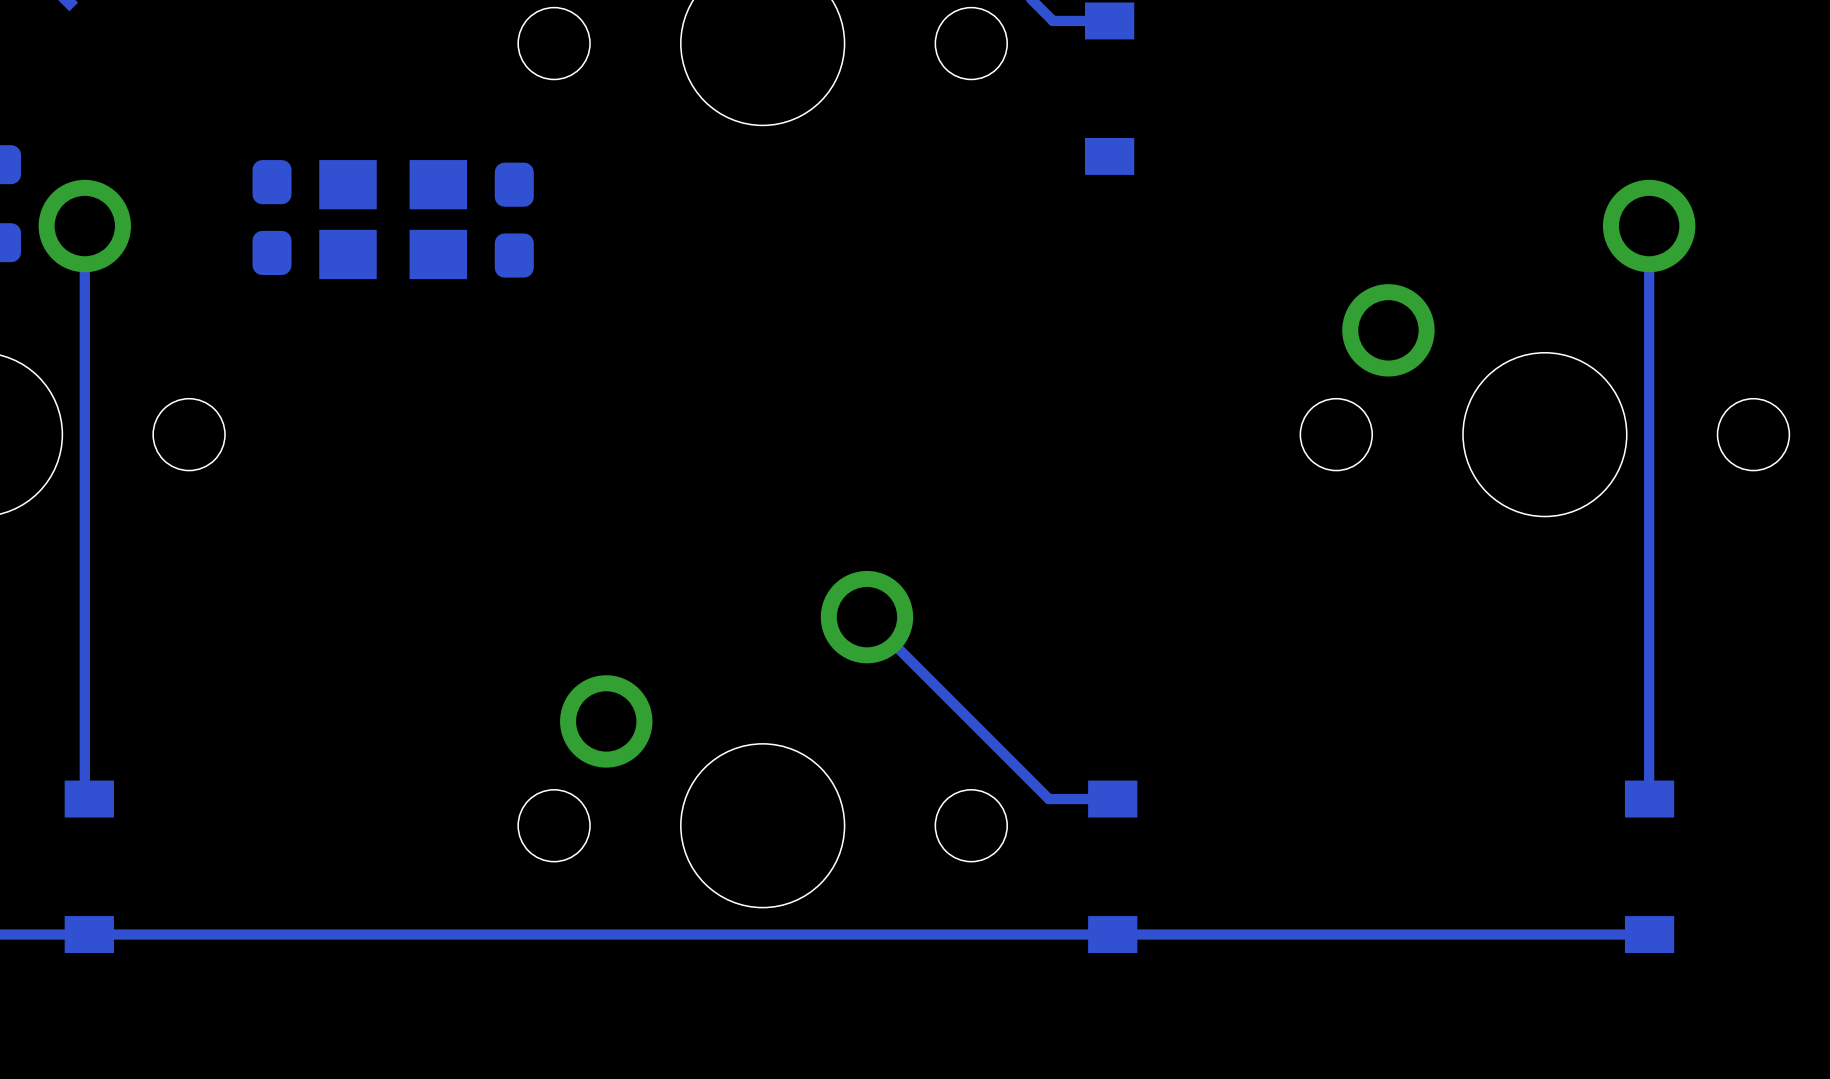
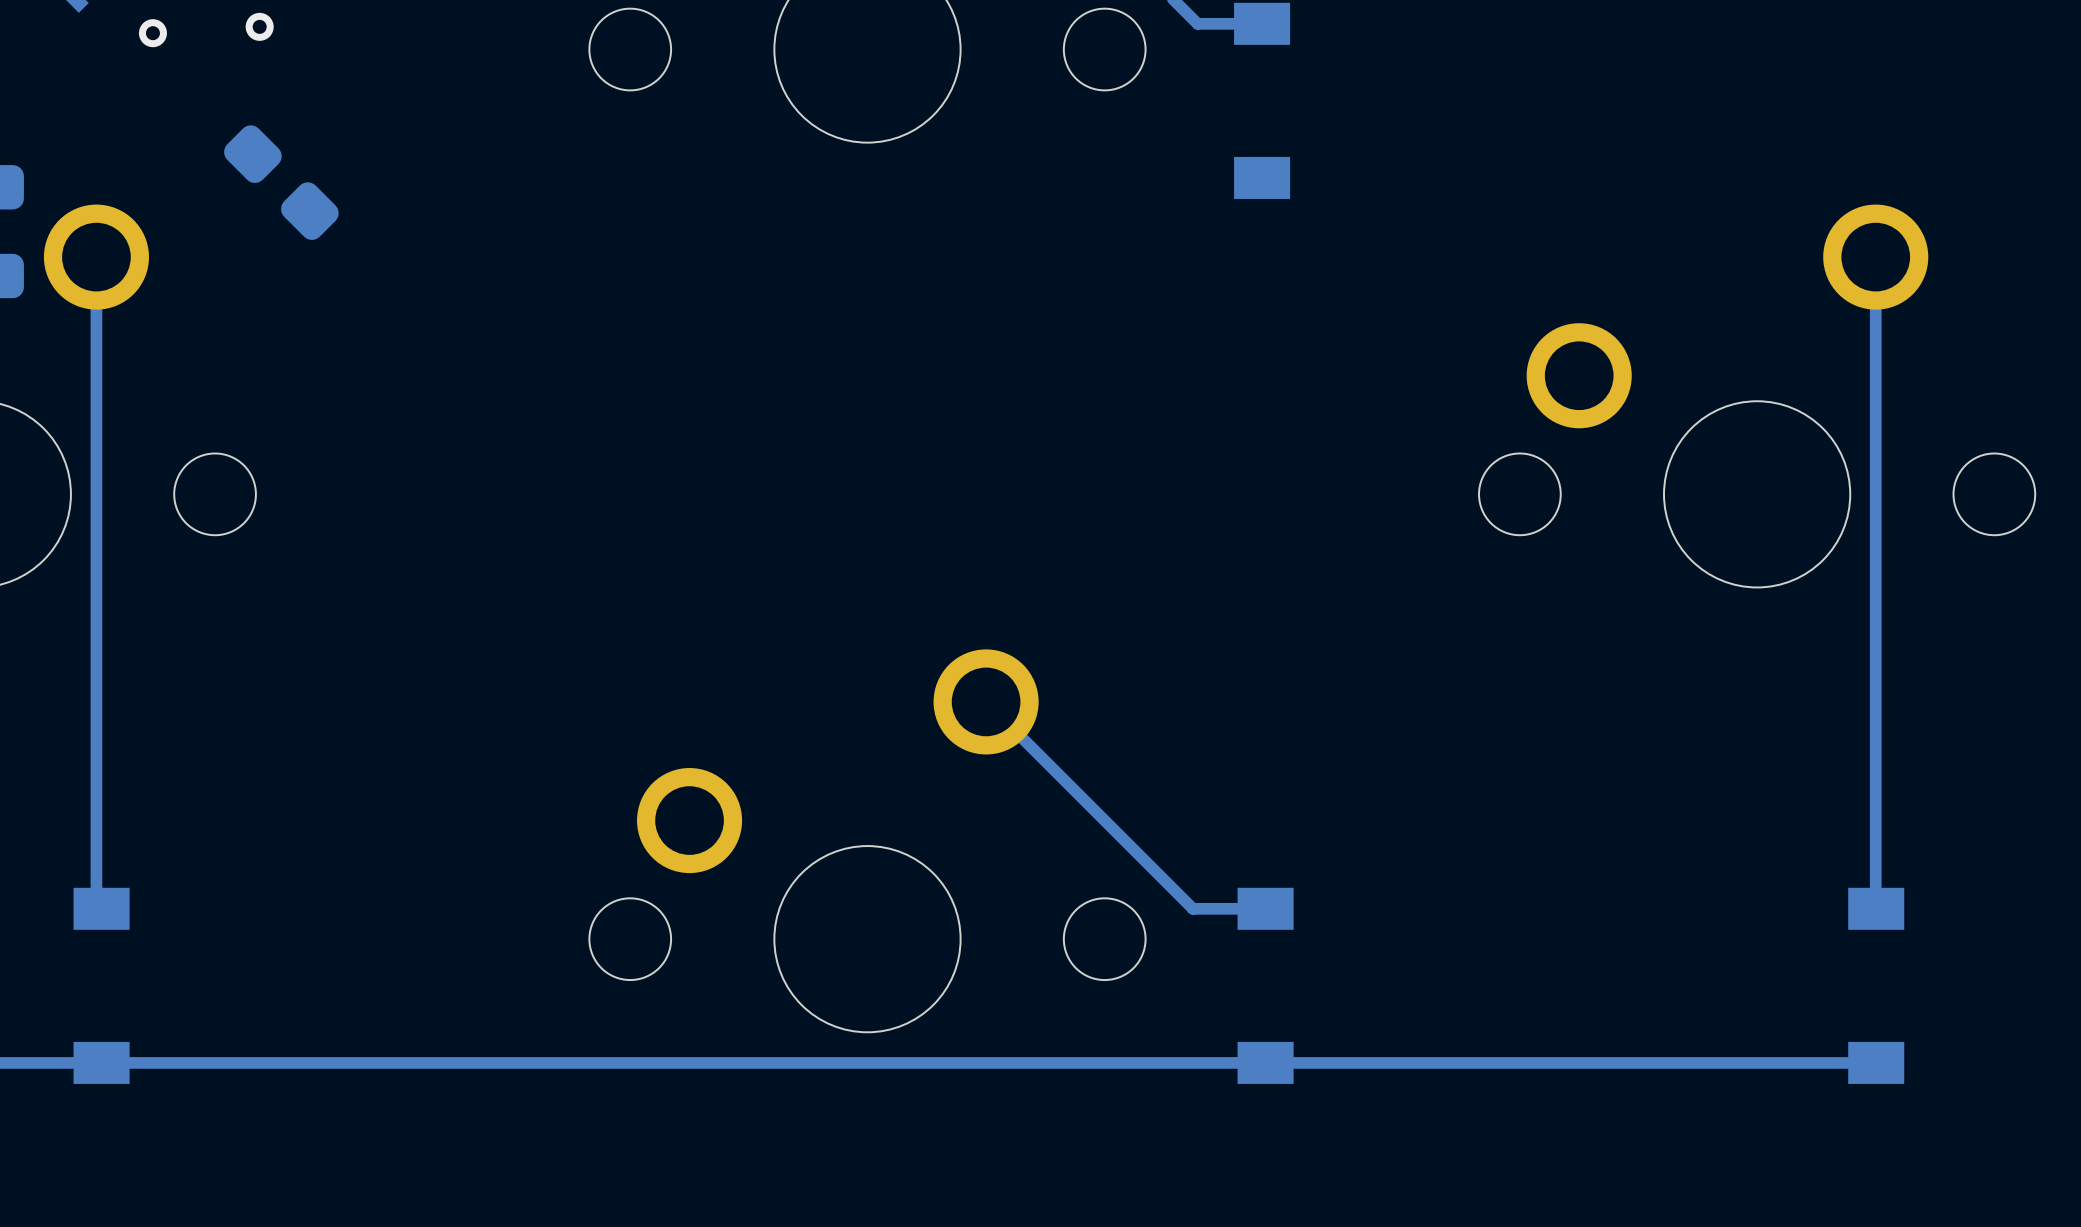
via: none -> (259, 26)
via: none -> (152, 33)
part: none -> (281, 182)
part: (272, 217) -> none
part: (393, 219) -> none
part: (514, 220) -> none

